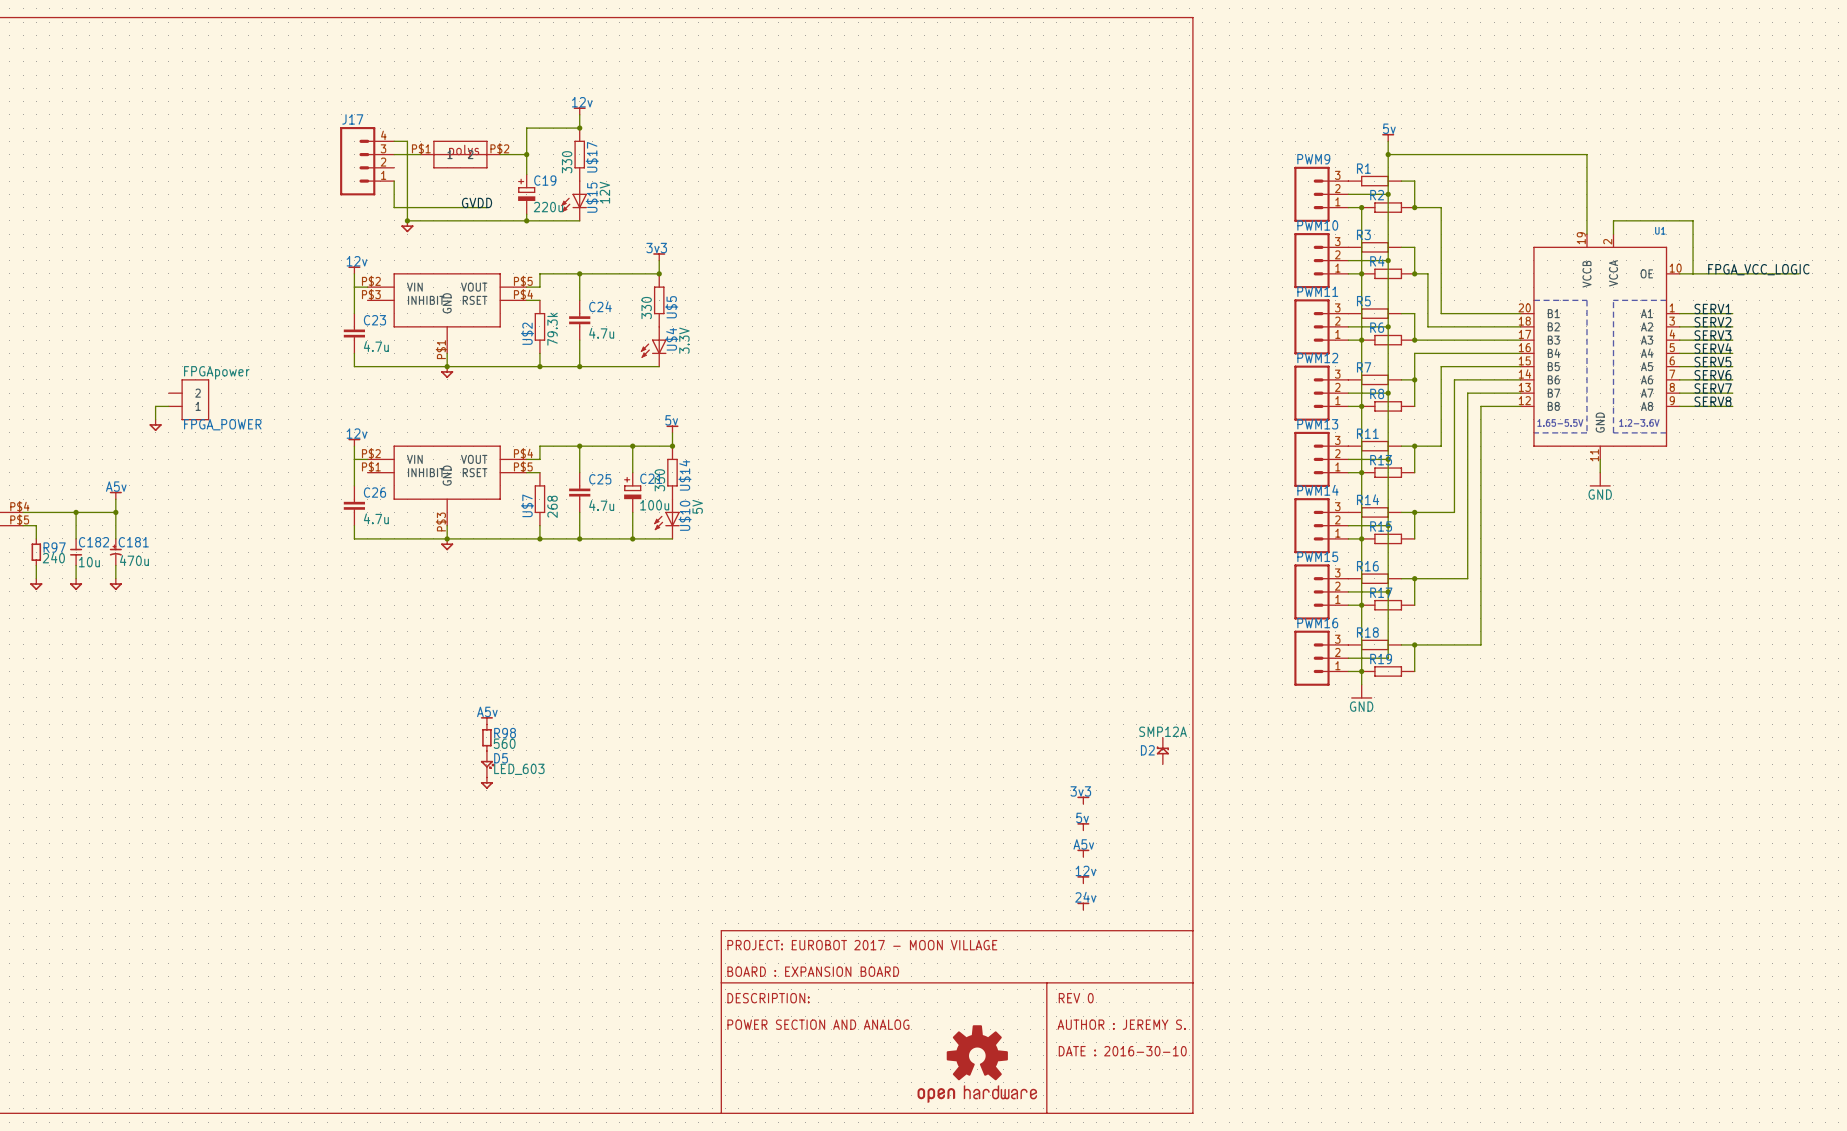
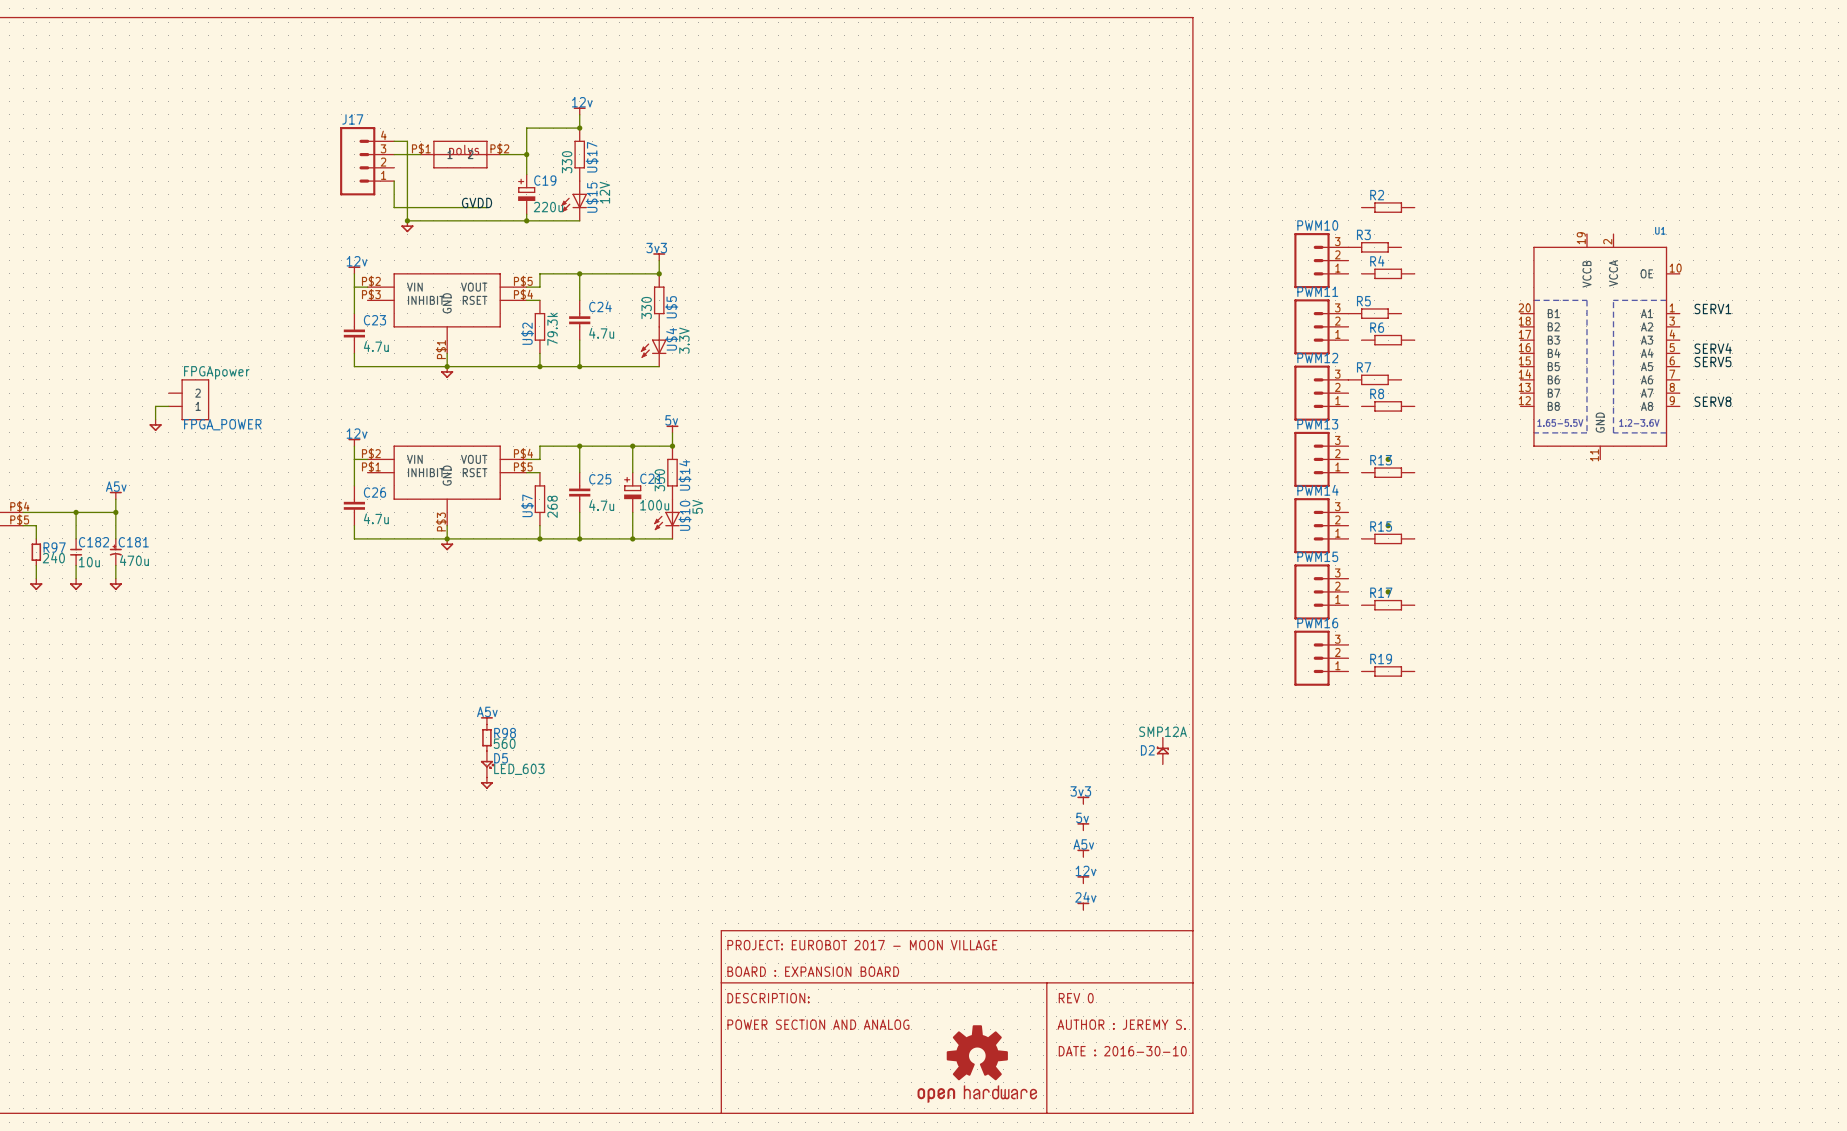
power symbol: (1388, 137) -> none
wire: (1388, 141) (1388, 658) (1348, 658) -> none
wire: (1388, 154) (1586, 154) (1586, 234) -> none
junction: (1388, 154) -> none
R1: (1374, 181) -> none
wire: (1401, 181) (1414, 181) (1414, 207) (1441, 207) (1441, 313) (1520, 313) -> none
PWM9: (1321, 194) -> none
wire: (1348, 194) (1388, 194) -> none
junction: (1388, 194) -> none
wire: (1348, 207) (1361, 207) (1361, 684) -> none
junction: (1361, 207) -> none
junction: (1414, 207) -> none
wire: (1613, 234) (1613, 220) (1693, 220) (1693, 273) -> none
wire: (1401, 247) (1414, 247) (1414, 273) (1427, 273) (1427, 326) (1520, 326) -> none
wire: (1348, 260) (1388, 260) -> none
junction: (1388, 260) -> none
label: FPGA_VCC_LOGIC (1758, 269) -> none
wire: (1348, 273) (1361, 273) -> none
junction: (1361, 273) -> none
junction: (1414, 273) -> none
wire: (1679, 273) (1799, 273) -> none
wire: (1401, 313) (1414, 313) (1414, 340) (1520, 340) -> none
wire: (1679, 313) (1732, 313) -> none
label: SERV2 (1712, 322) -> none
wire: (1348, 326) (1388, 326) -> none
junction: (1388, 326) -> none
wire: (1679, 326) (1732, 326) -> none
label: SERV3 (1712, 335) -> none
wire: (1348, 340) (1361, 340) -> none
junction: (1361, 340) -> none
junction: (1414, 340) -> none
wire: (1679, 340) (1732, 340) -> none
wire: (1520, 353) (1414, 353) (1414, 406) -> none
wire: (1679, 353) (1732, 353) -> none
wire: (1520, 366) (1441, 366) (1441, 446) (1401, 446) -> none
wire: (1679, 366) (1732, 366) -> none
label: SERV6 (1712, 375) -> none
wire: (1401, 379) (1414, 379) -> none
junction: (1414, 379) -> none
wire: (1520, 379) (1454, 379) (1454, 512) (1401, 512) -> none
wire: (1679, 379) (1732, 379) -> none
label: SERV7 (1713, 388) -> none
wire: (1348, 393) (1388, 393) -> none
junction: (1388, 393) -> none
wire: (1520, 393) (1467, 393) (1467, 578) (1401, 578) -> none
wire: (1679, 393) (1732, 393) -> none
wire: (1348, 406) (1361, 406) -> none
junction: (1361, 406) -> none
wire: (1520, 406) (1480, 406) (1480, 644) (1401, 644) -> none
wire: (1679, 406) (1732, 406) -> none
R11: (1374, 446) -> none
wire: (1414, 446) (1414, 472) -> none
junction: (1414, 446) -> none
wire: (1348, 459) (1388, 459) -> none
wire: (1600, 459) (1600, 472) -> none
wire: (1348, 472) (1361, 472) -> none
junction: (1361, 472) -> none
power symbol: GND (1600, 479) -> none
R14: (1374, 512) -> none
wire: (1414, 512) (1414, 538) -> none
junction: (1414, 512) -> none
wire: (1348, 525) (1388, 525) -> none
wire: (1348, 538) (1361, 538) -> none
junction: (1361, 538) -> none
R16: (1374, 578) -> none
wire: (1414, 578) (1414, 605) -> none
junction: (1414, 578) -> none
wire: (1348, 591) (1388, 591) -> none
wire: (1348, 605) (1361, 605) -> none
junction: (1361, 605) -> none
R18: (1374, 644) -> none
wire: (1414, 644) (1414, 671) -> none
junction: (1414, 644) -> none
wire: (1348, 671) (1361, 671) -> none
junction: (1361, 671) -> none
power symbol: GND (1361, 691) -> none

